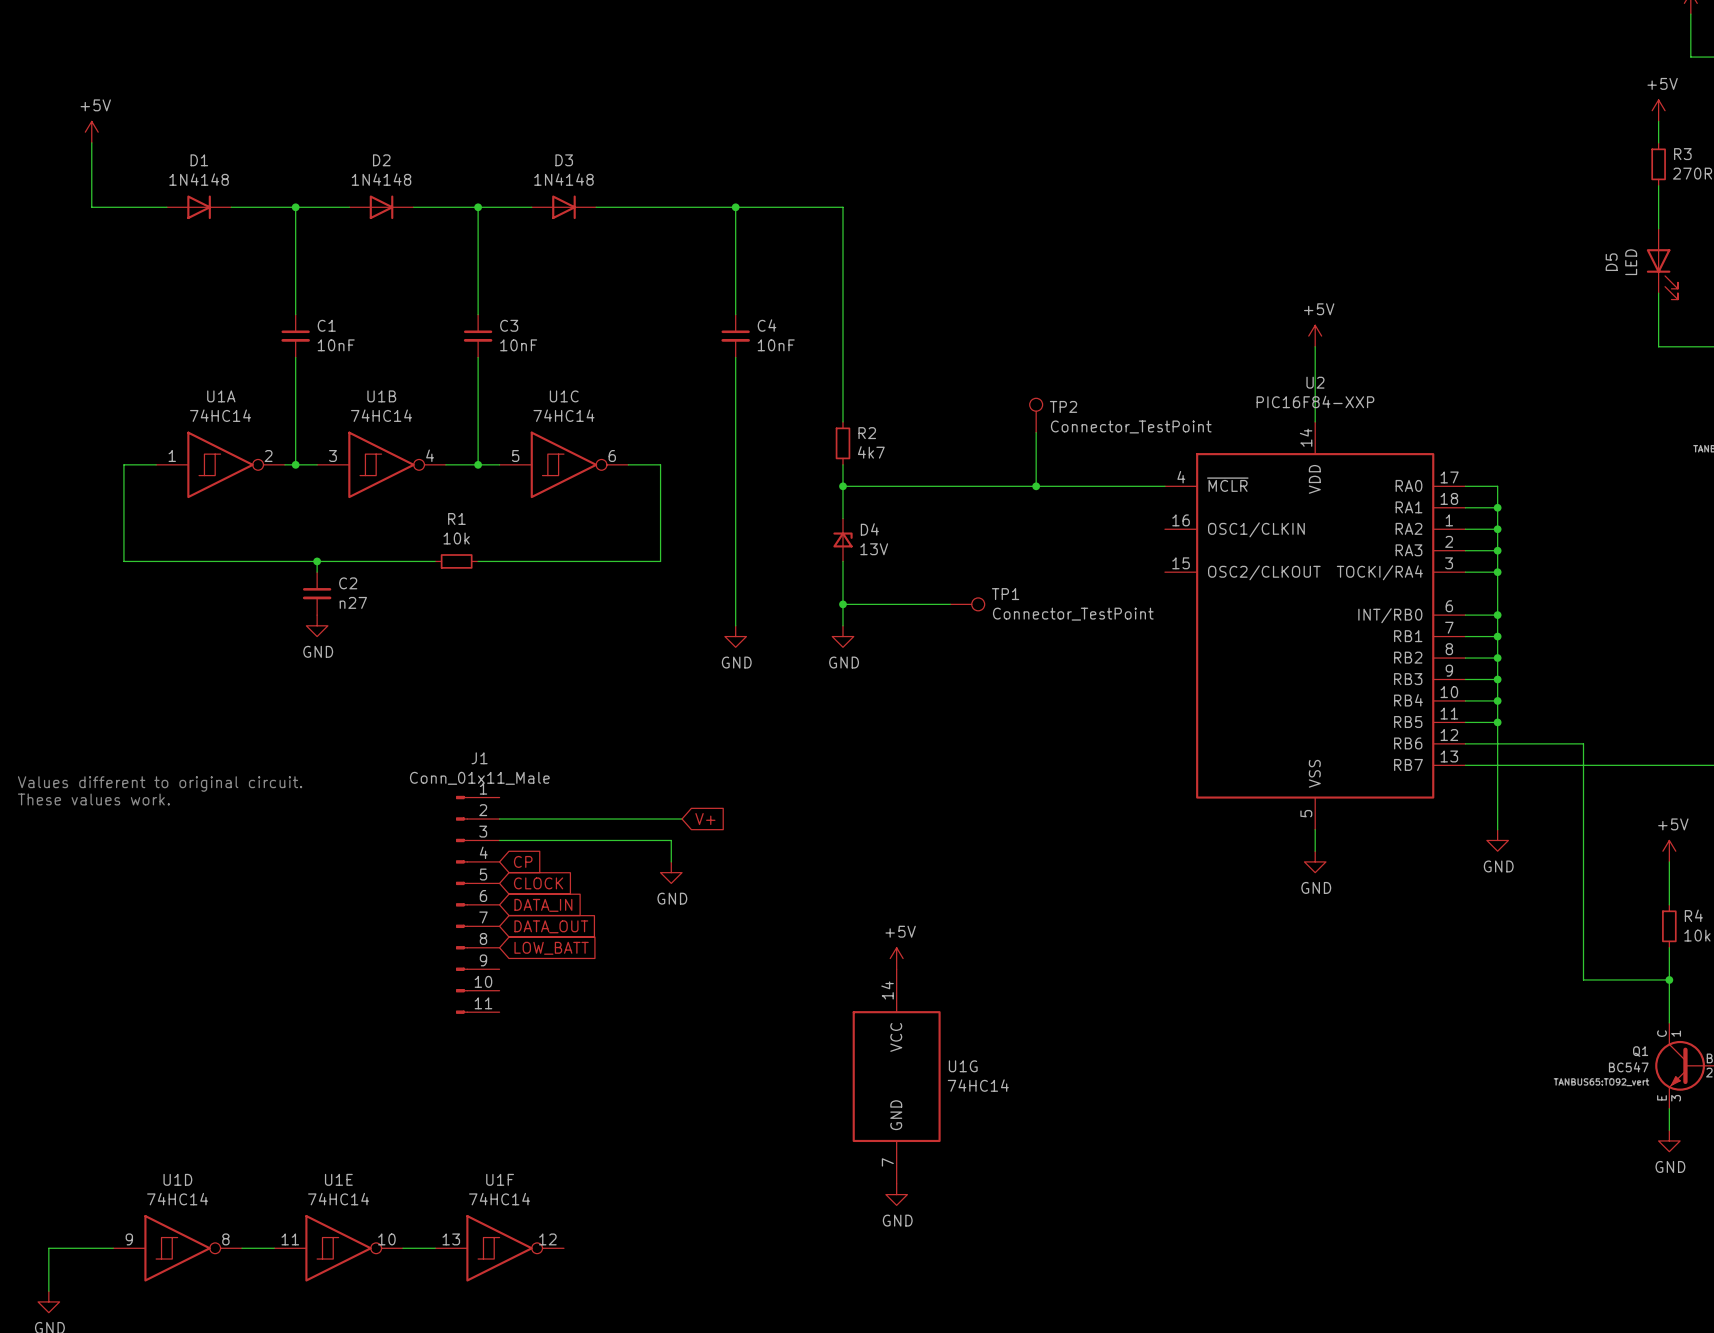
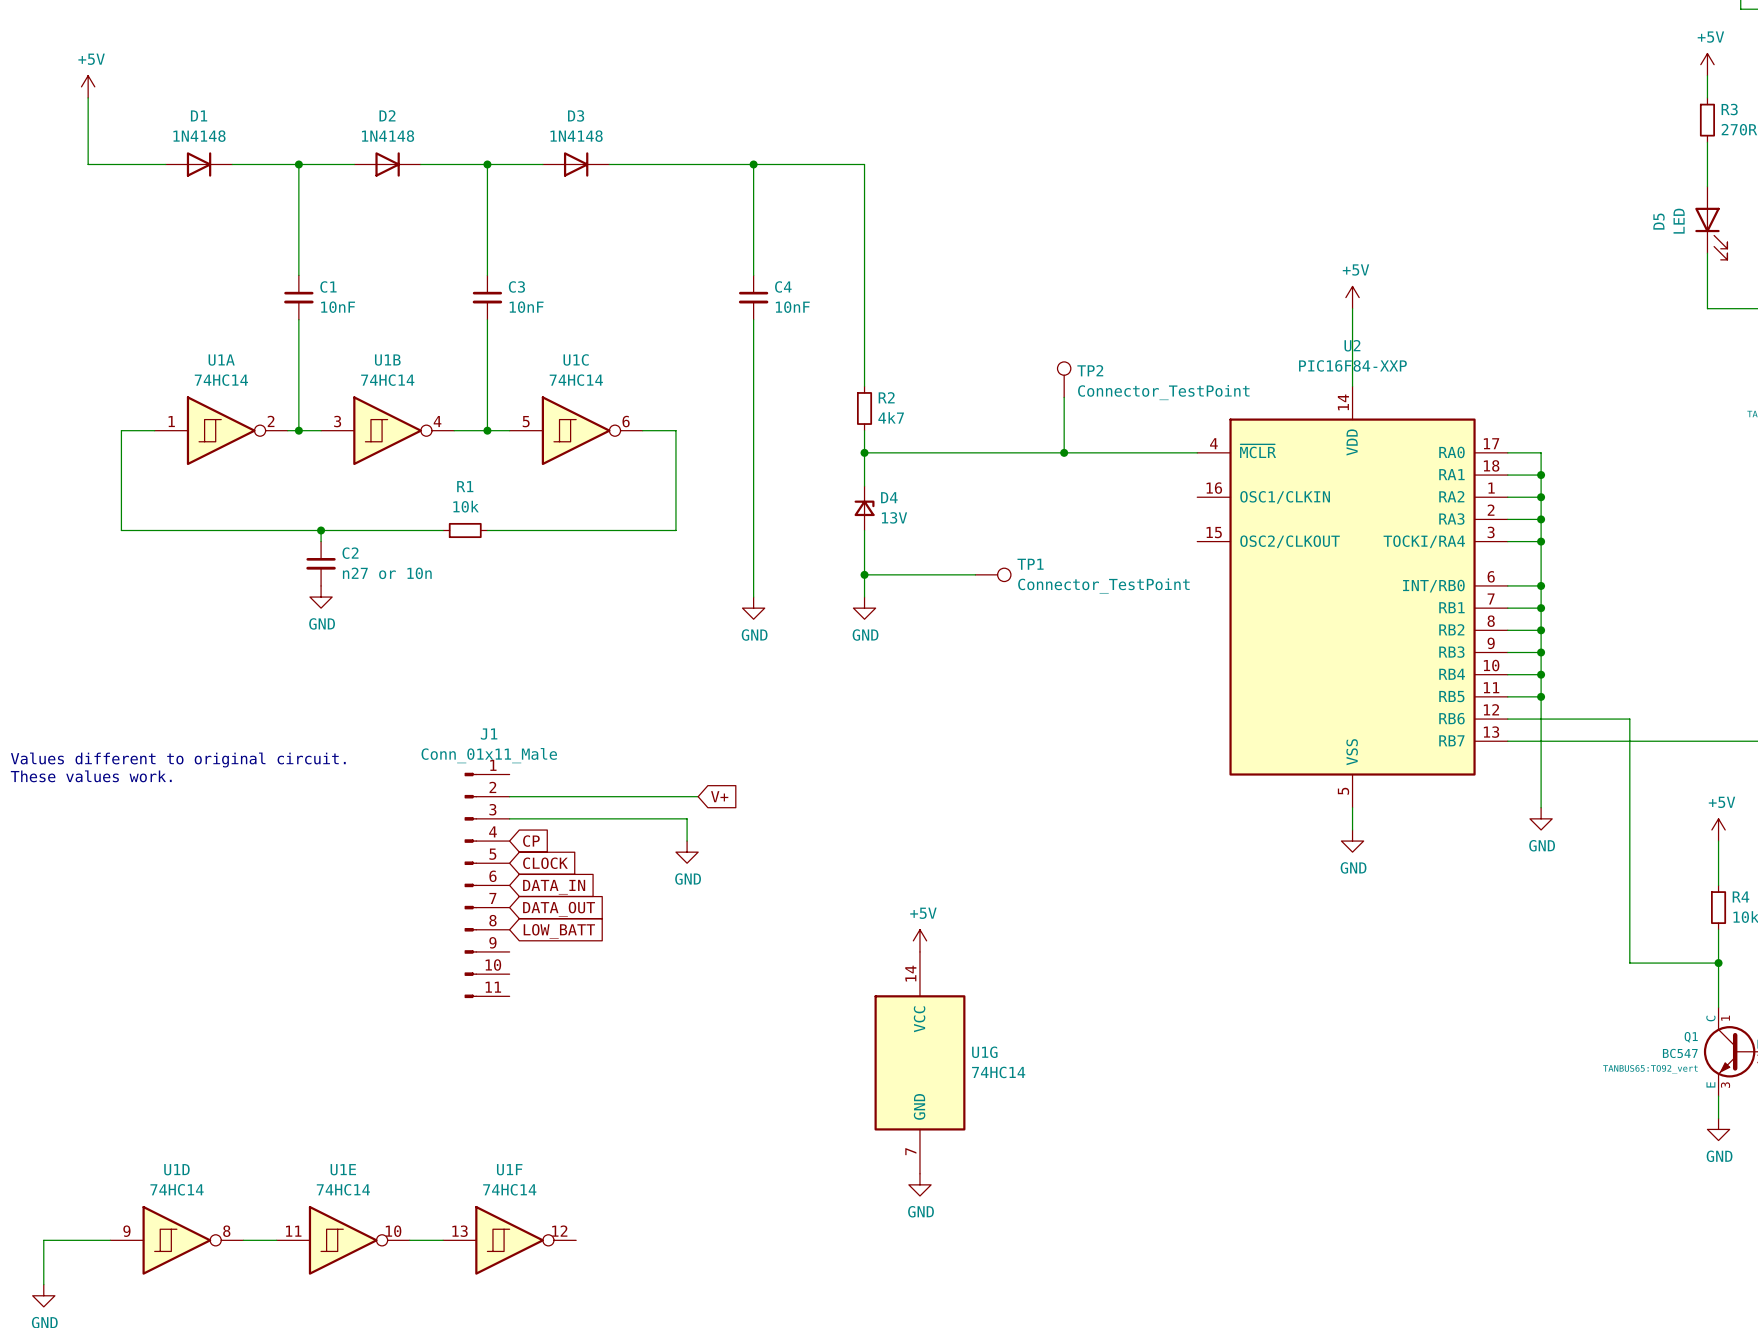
C2 value: n27 (353, 602) -> n27 or 10n (387, 573)

